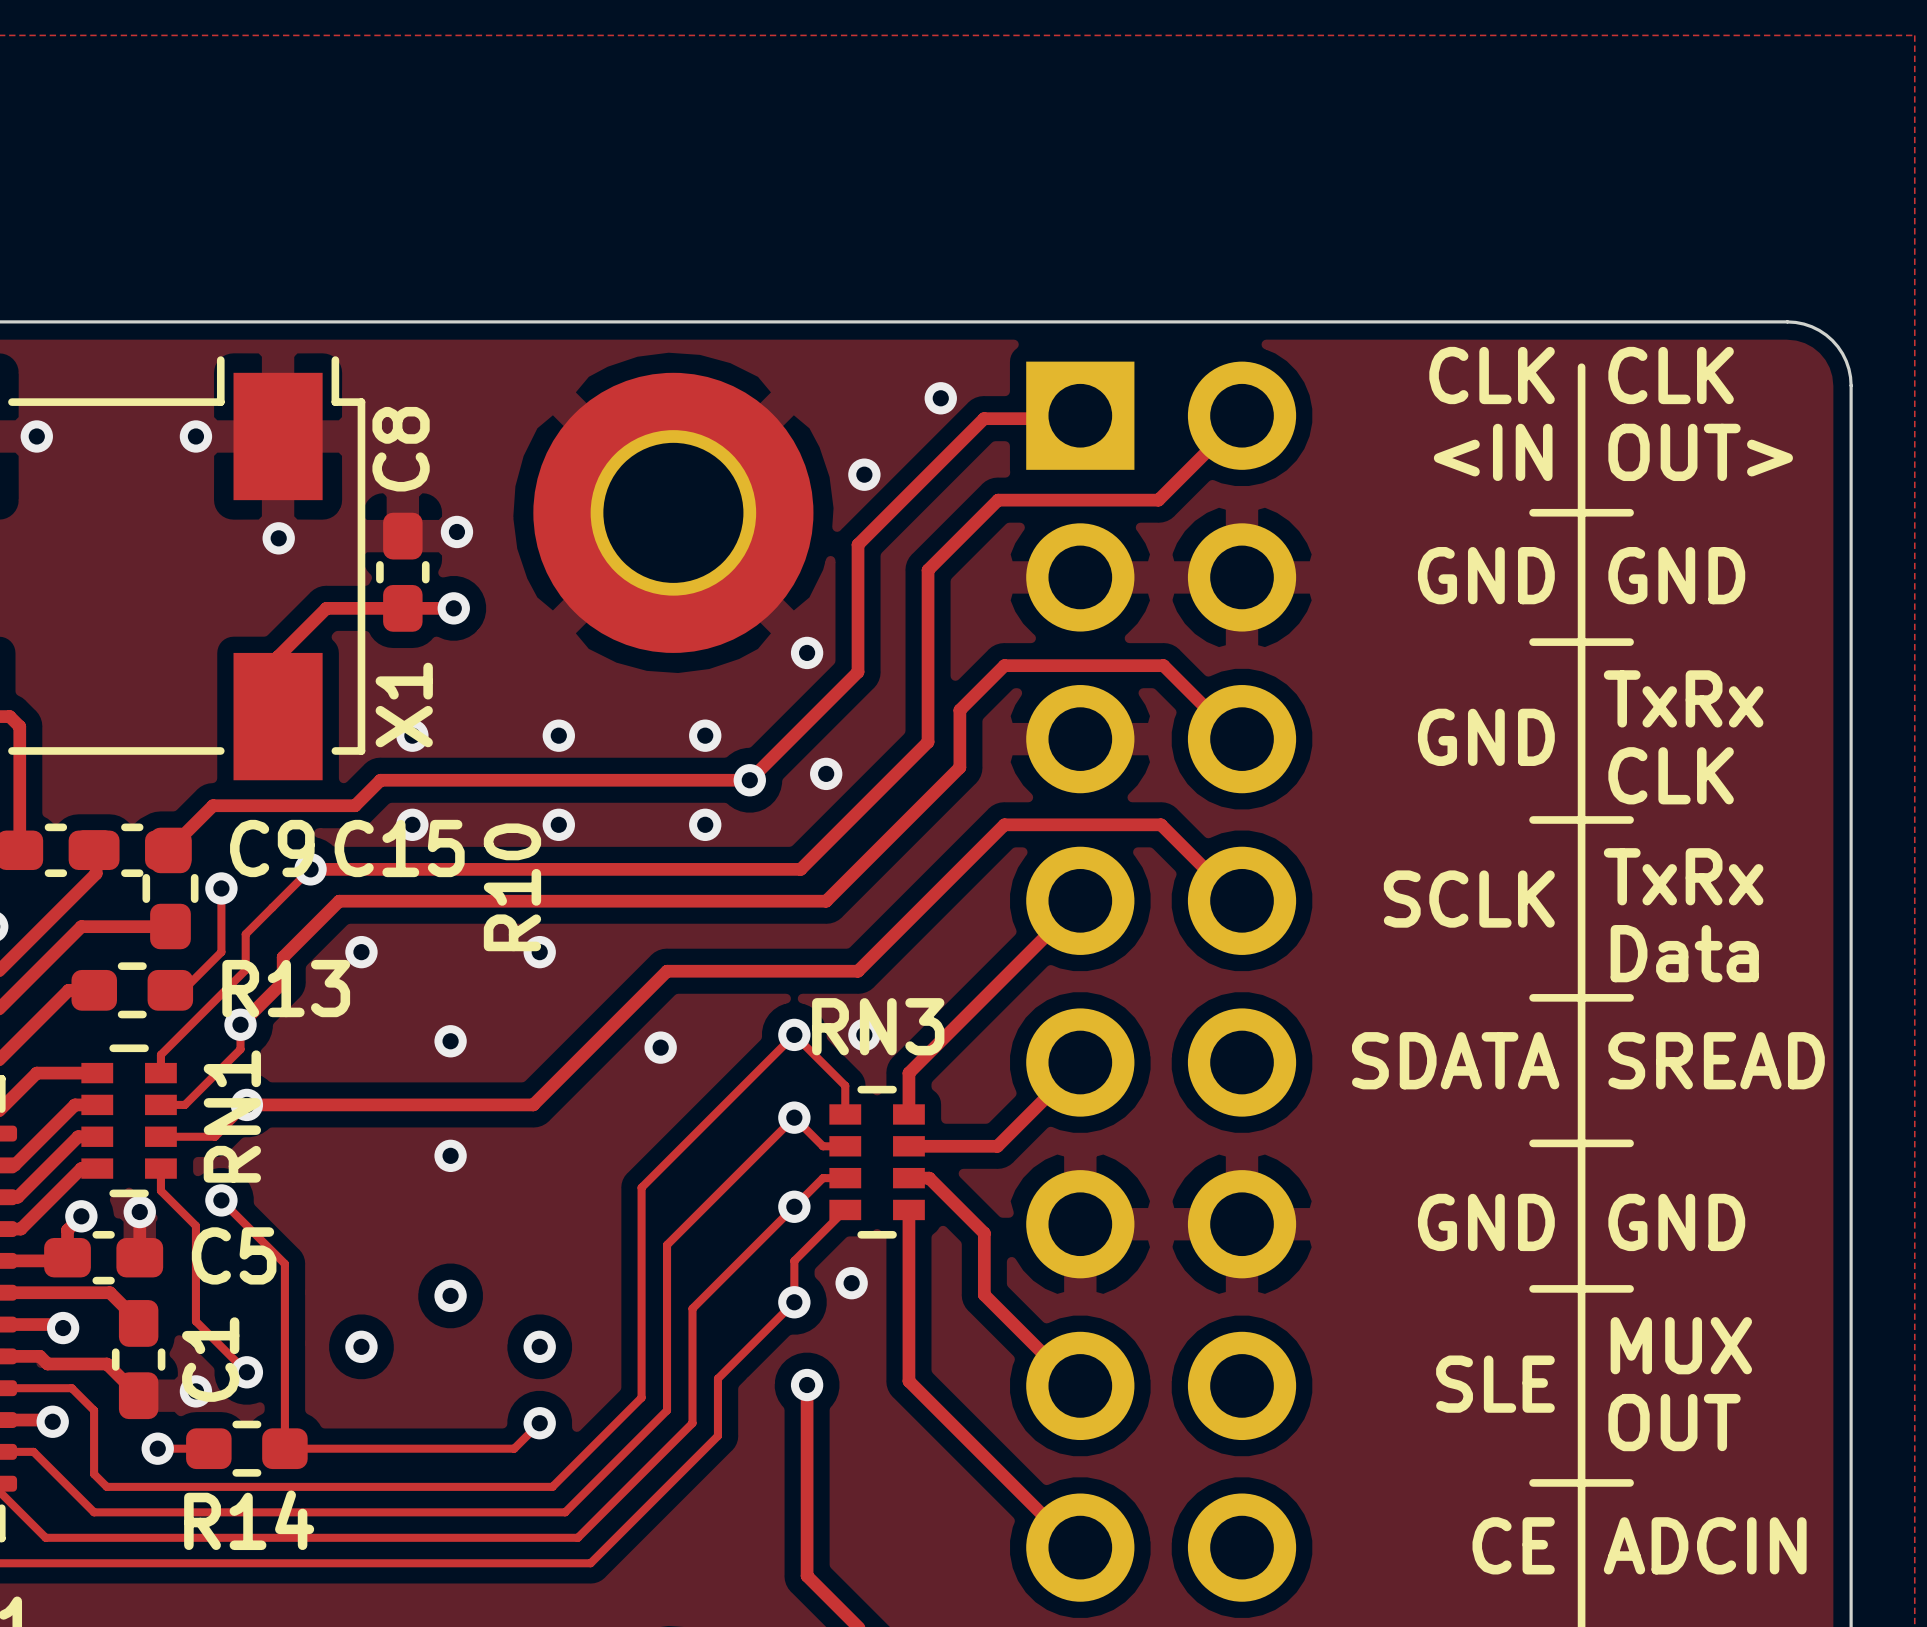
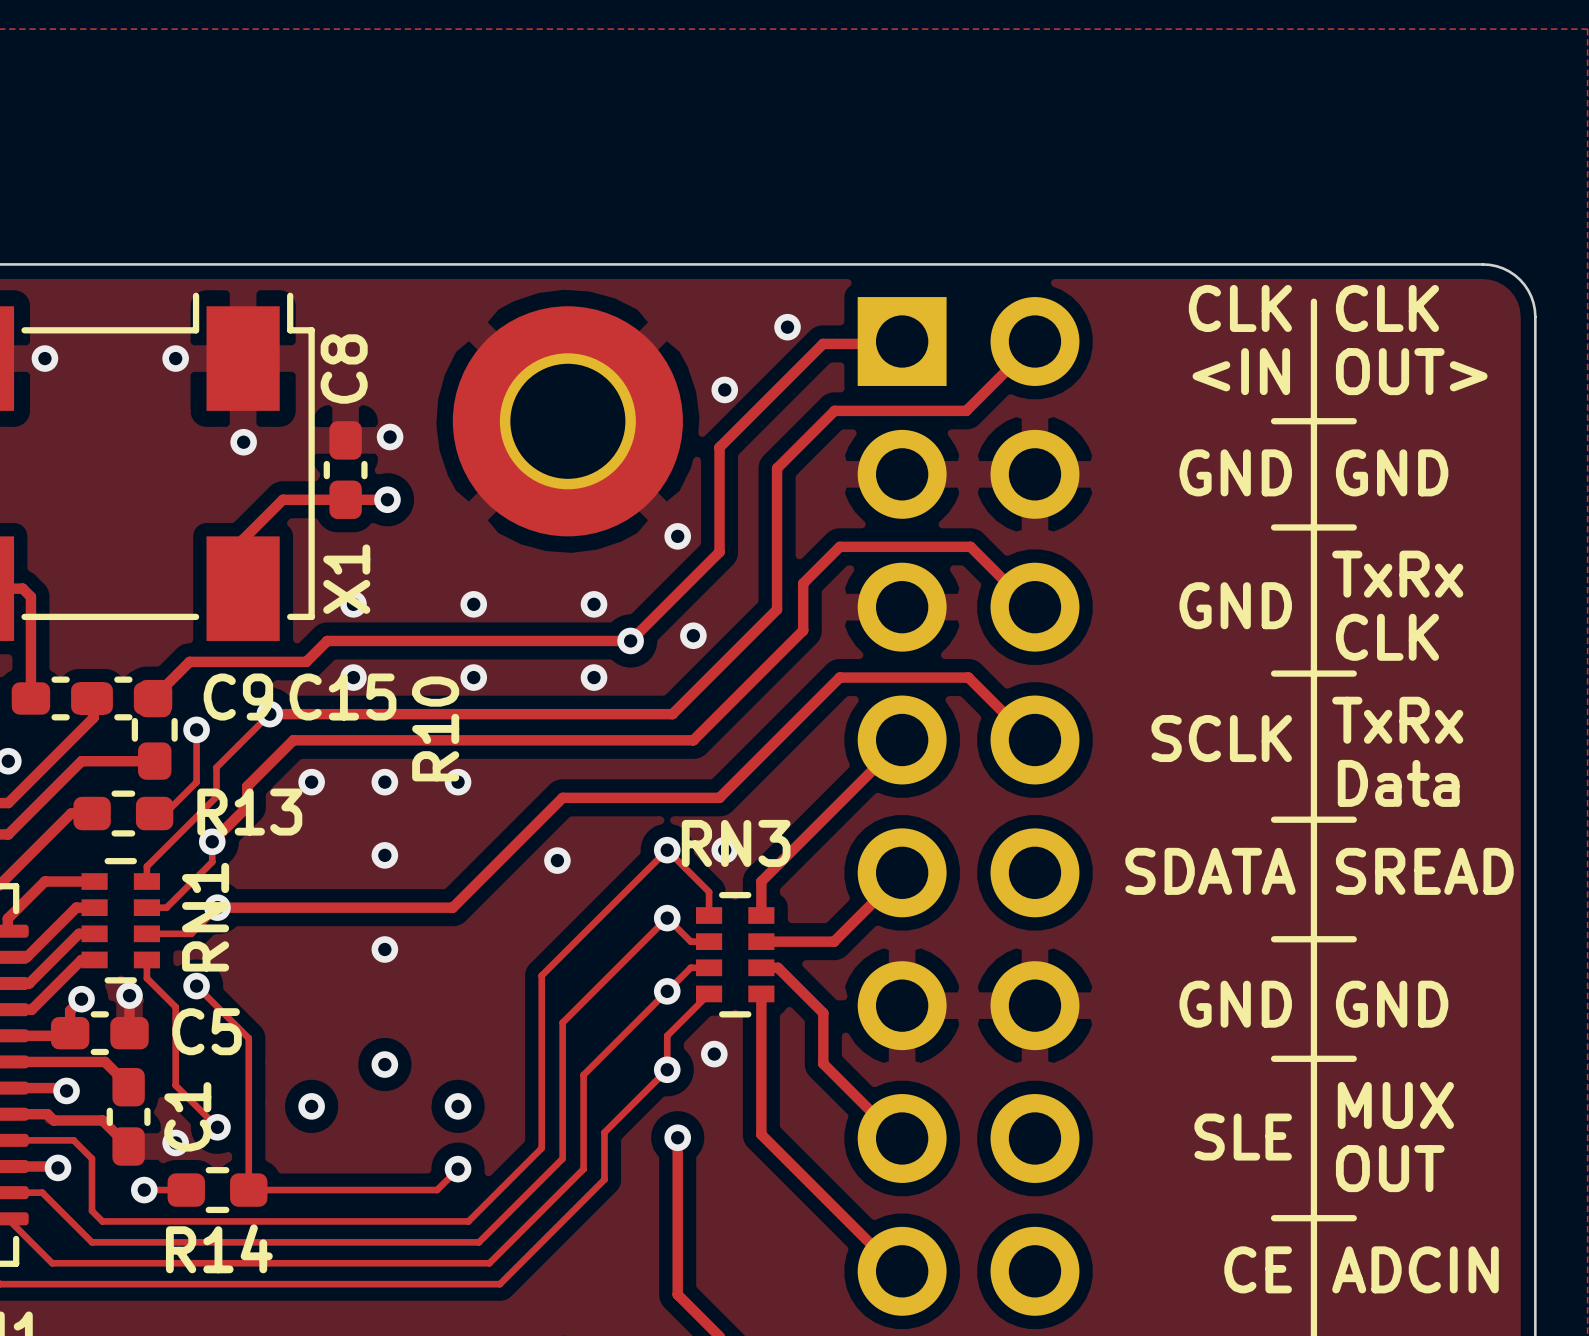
via: none -> (384, 782)

